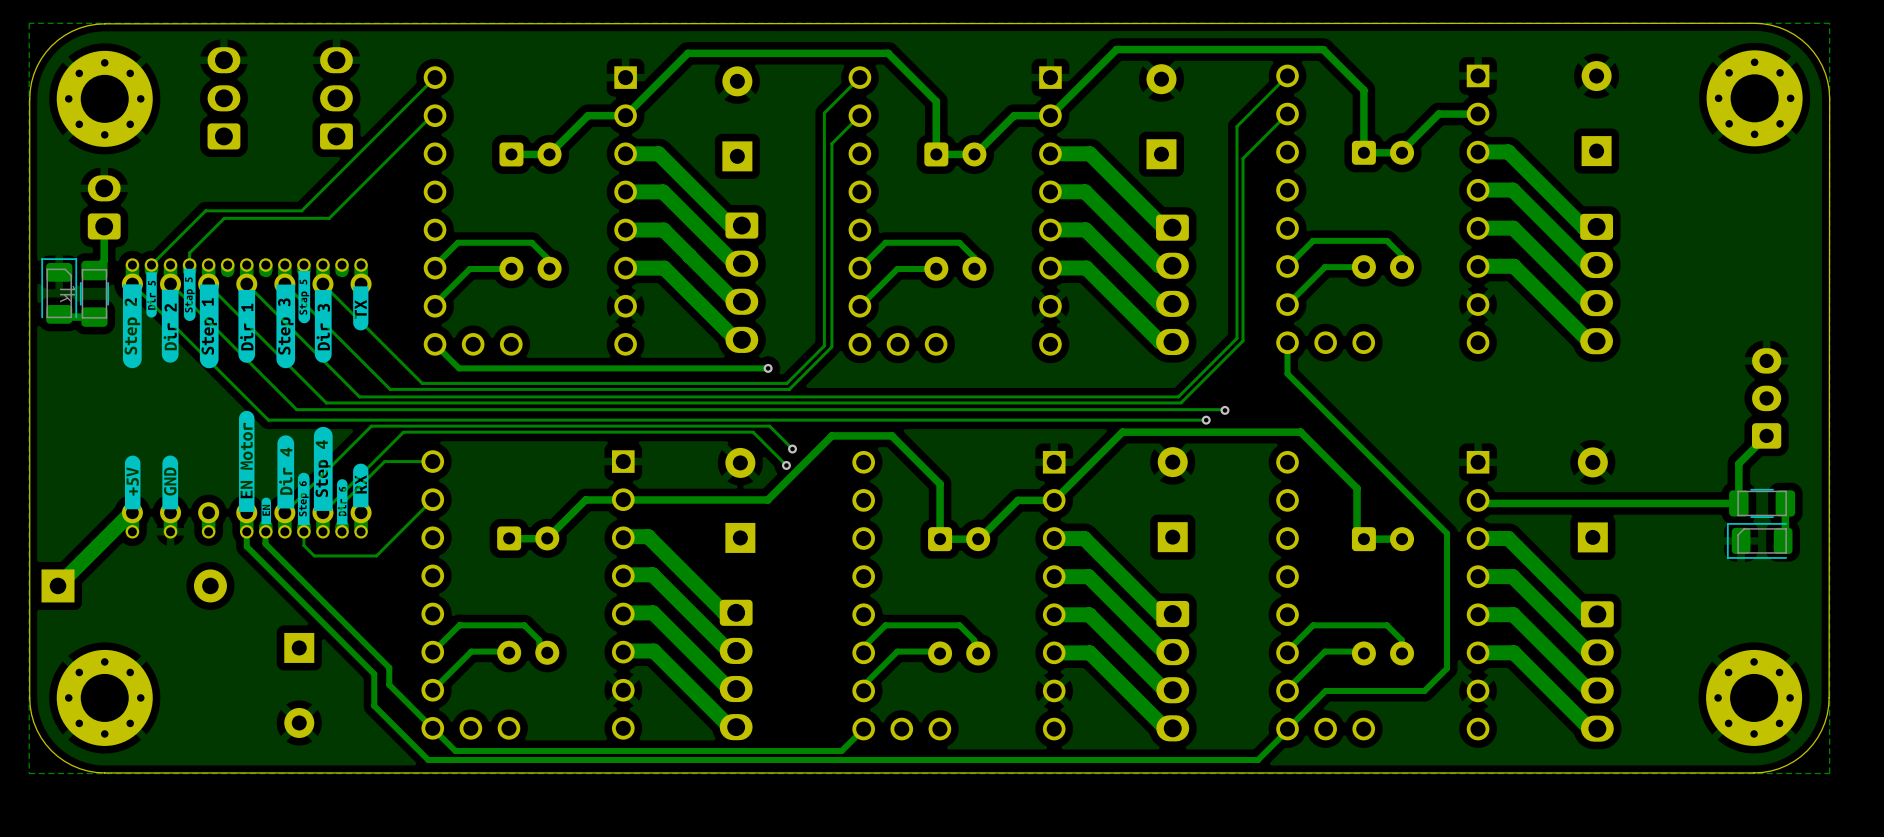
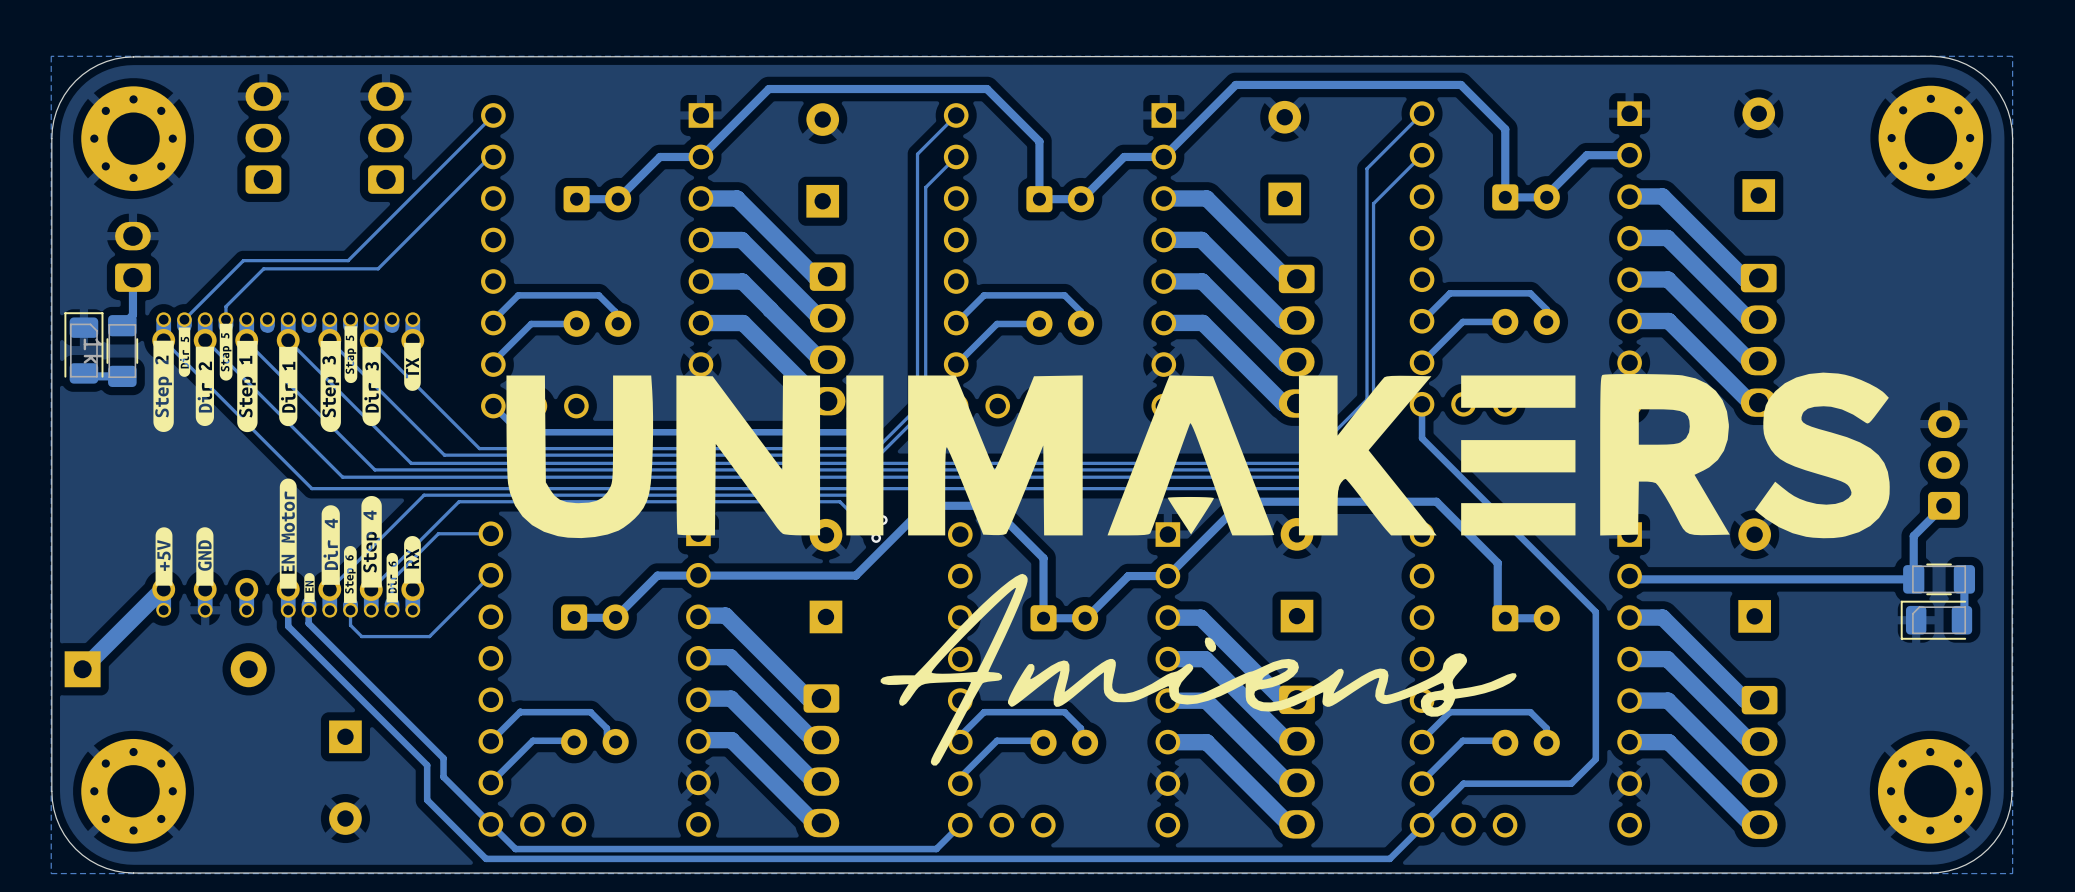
drawing: none -> [506, 372, 1890, 766]

